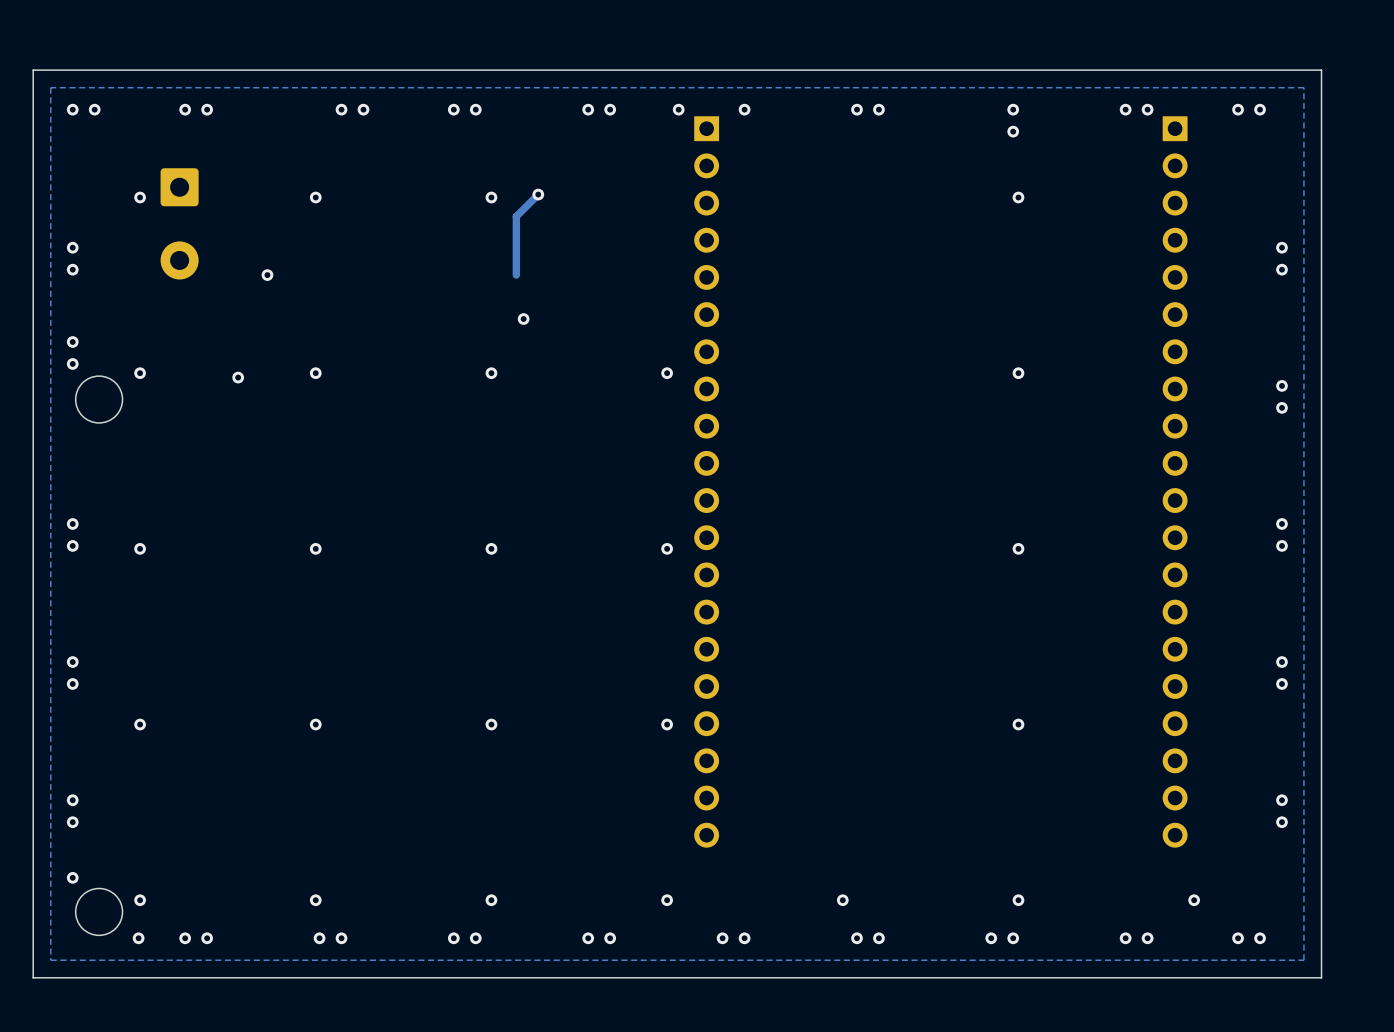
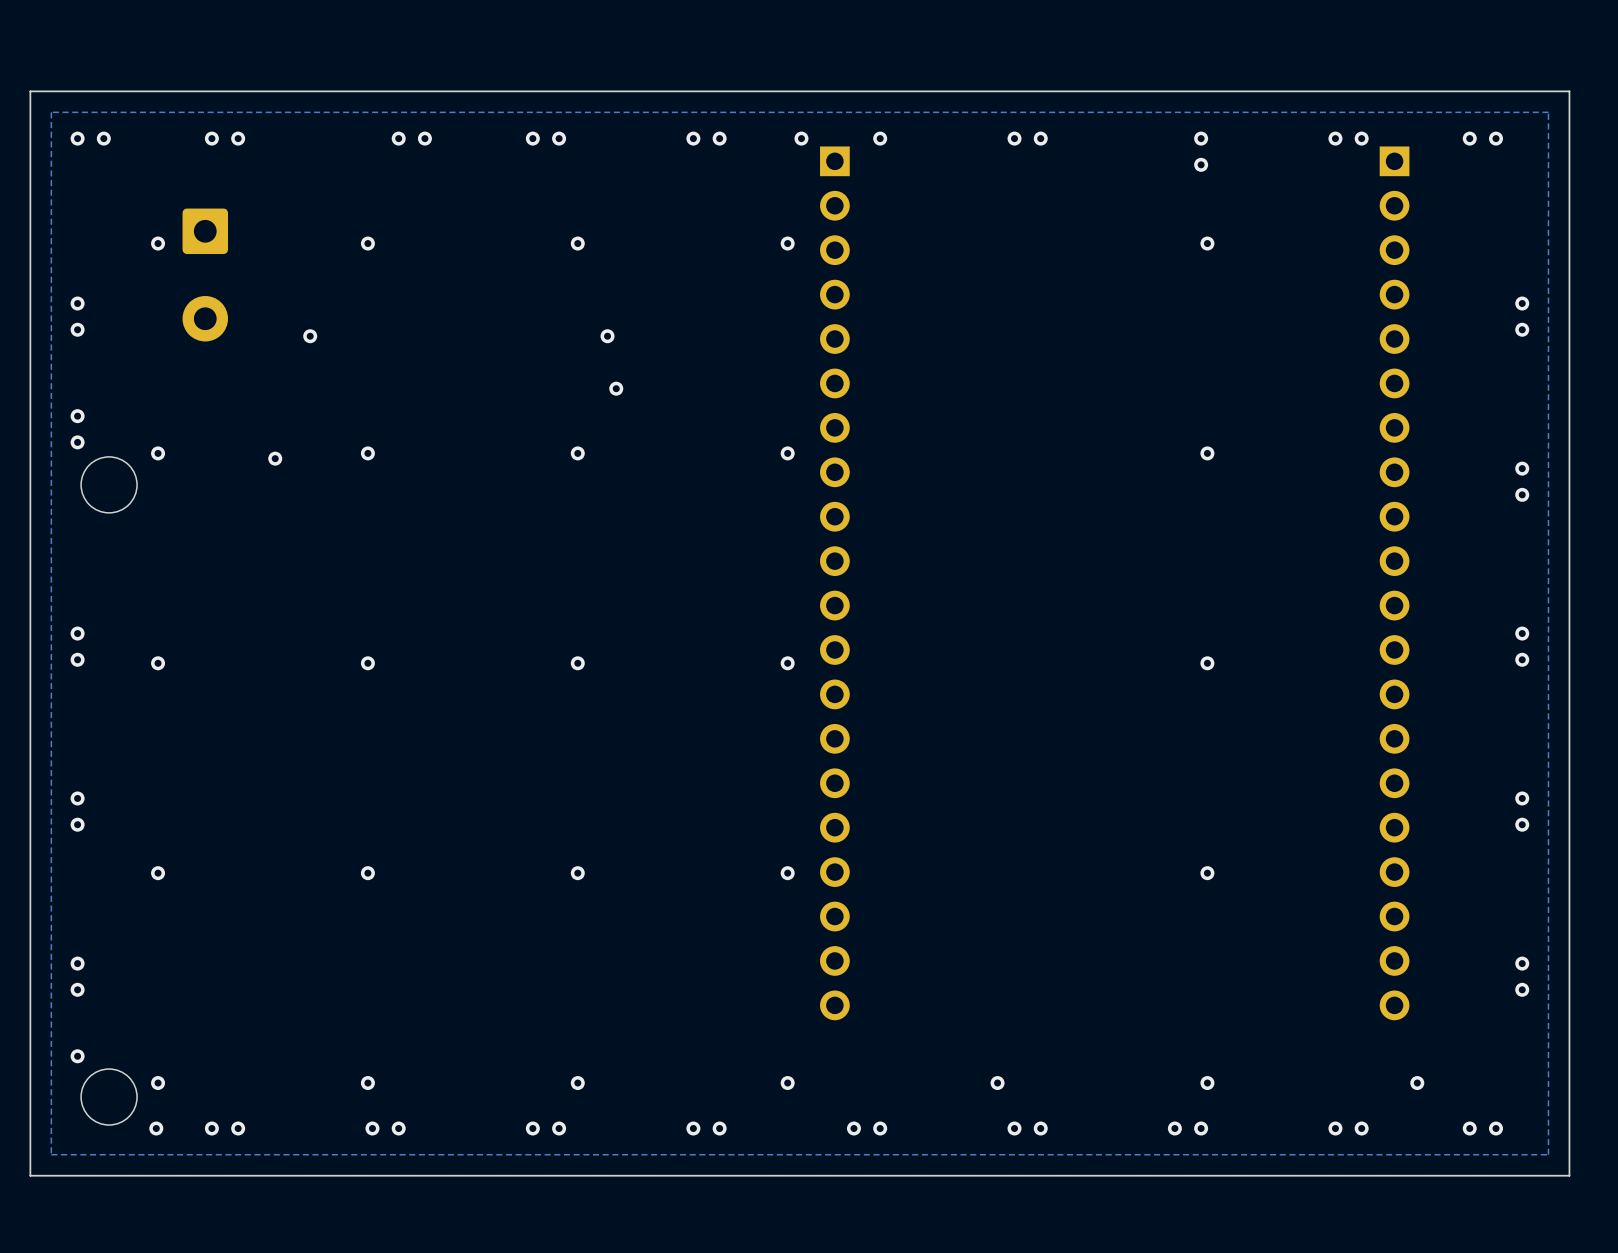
track: (538, 194) (516, 216) (516, 275) -> none
via: (538, 194) -> none
via: none -> (787, 243)
via: none -> (607, 336)

